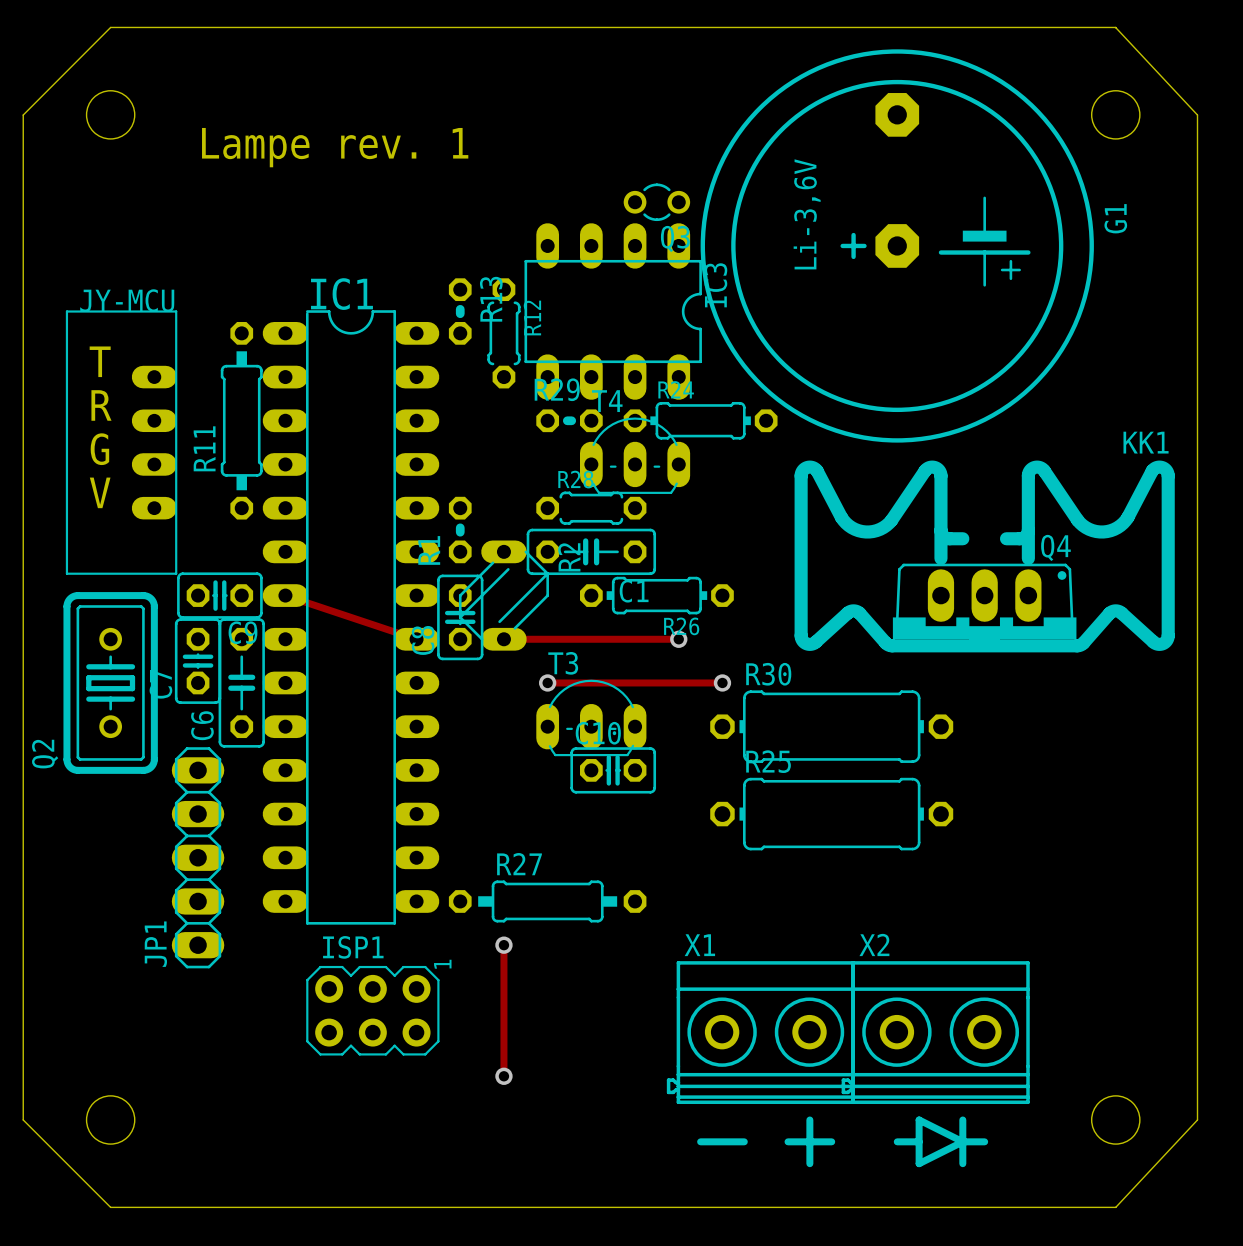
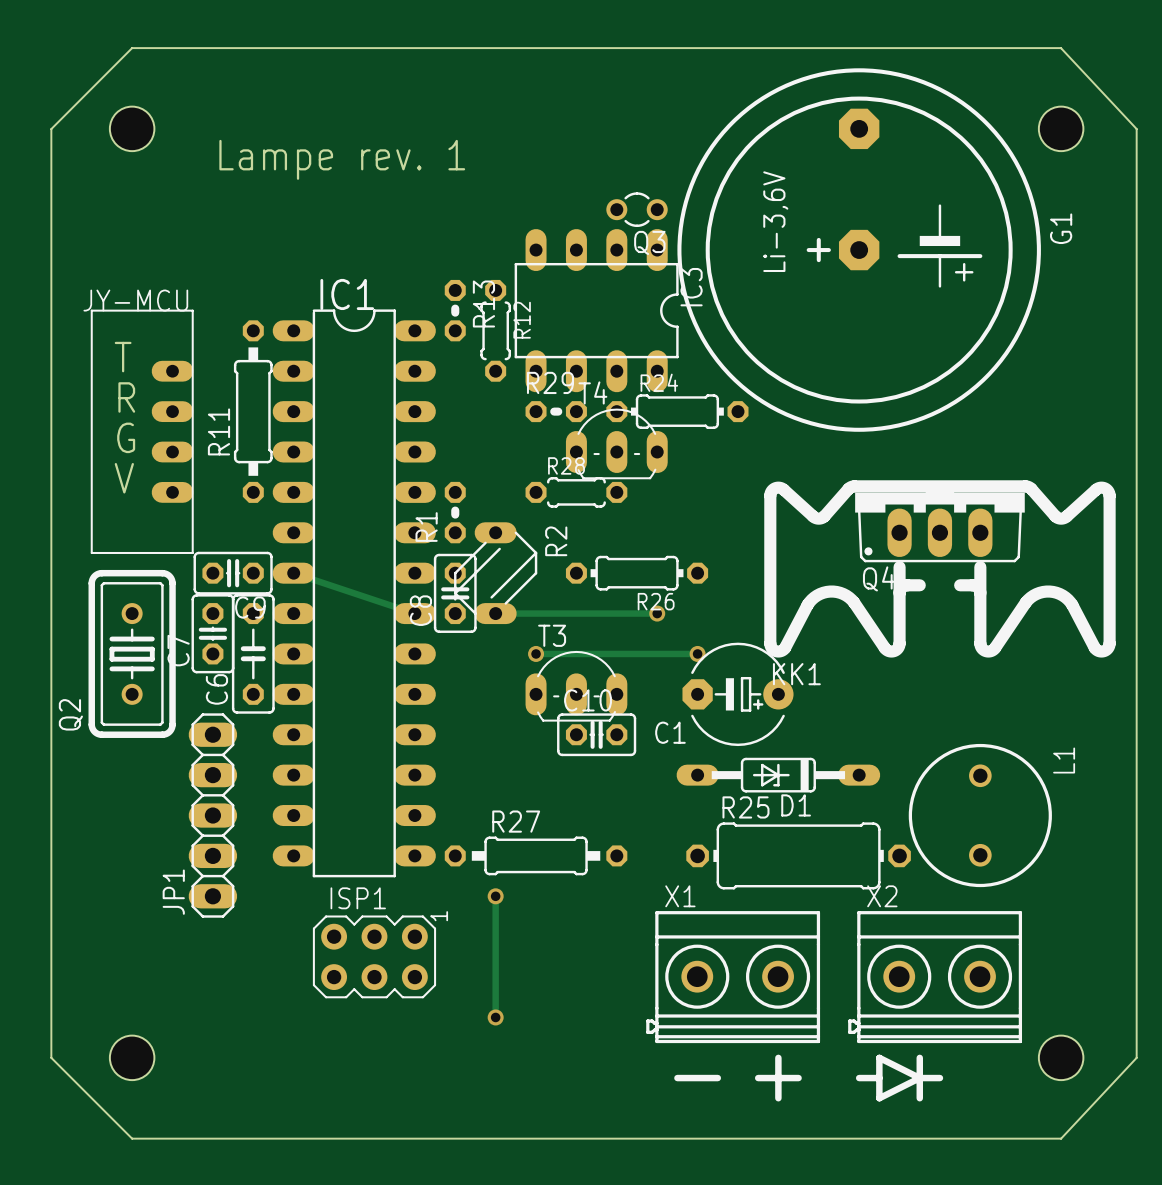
C1 footprint: [526, 528, 657, 576] -> [682, 642, 794, 747]
KK1 rotation: 0° (984, 556) -> 180° (939, 568)
C1 name position: C1 (634, 591) -> C1 (670, 732)
Q4 rotation: 0° (984, 601) -> 180° (939, 527)
R30: (831, 726) -> none
D1: none -> (778, 775)
R25 position: (831, 814) -> (798, 855)
L1: none -> (980, 815)
X2 position: (935, 1032) -> (935, 977)

